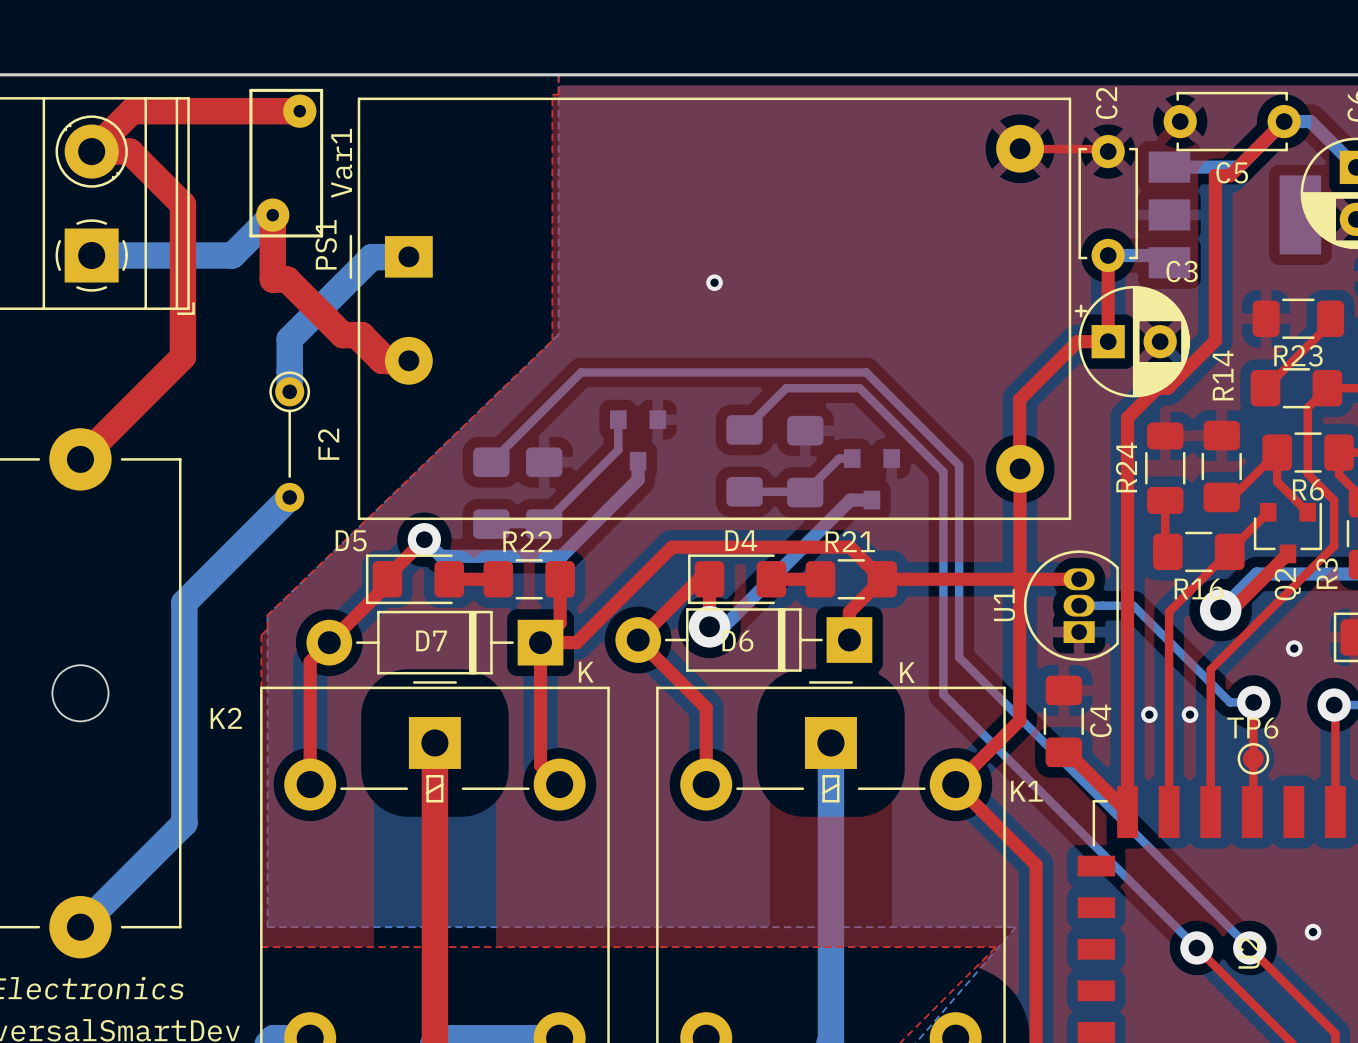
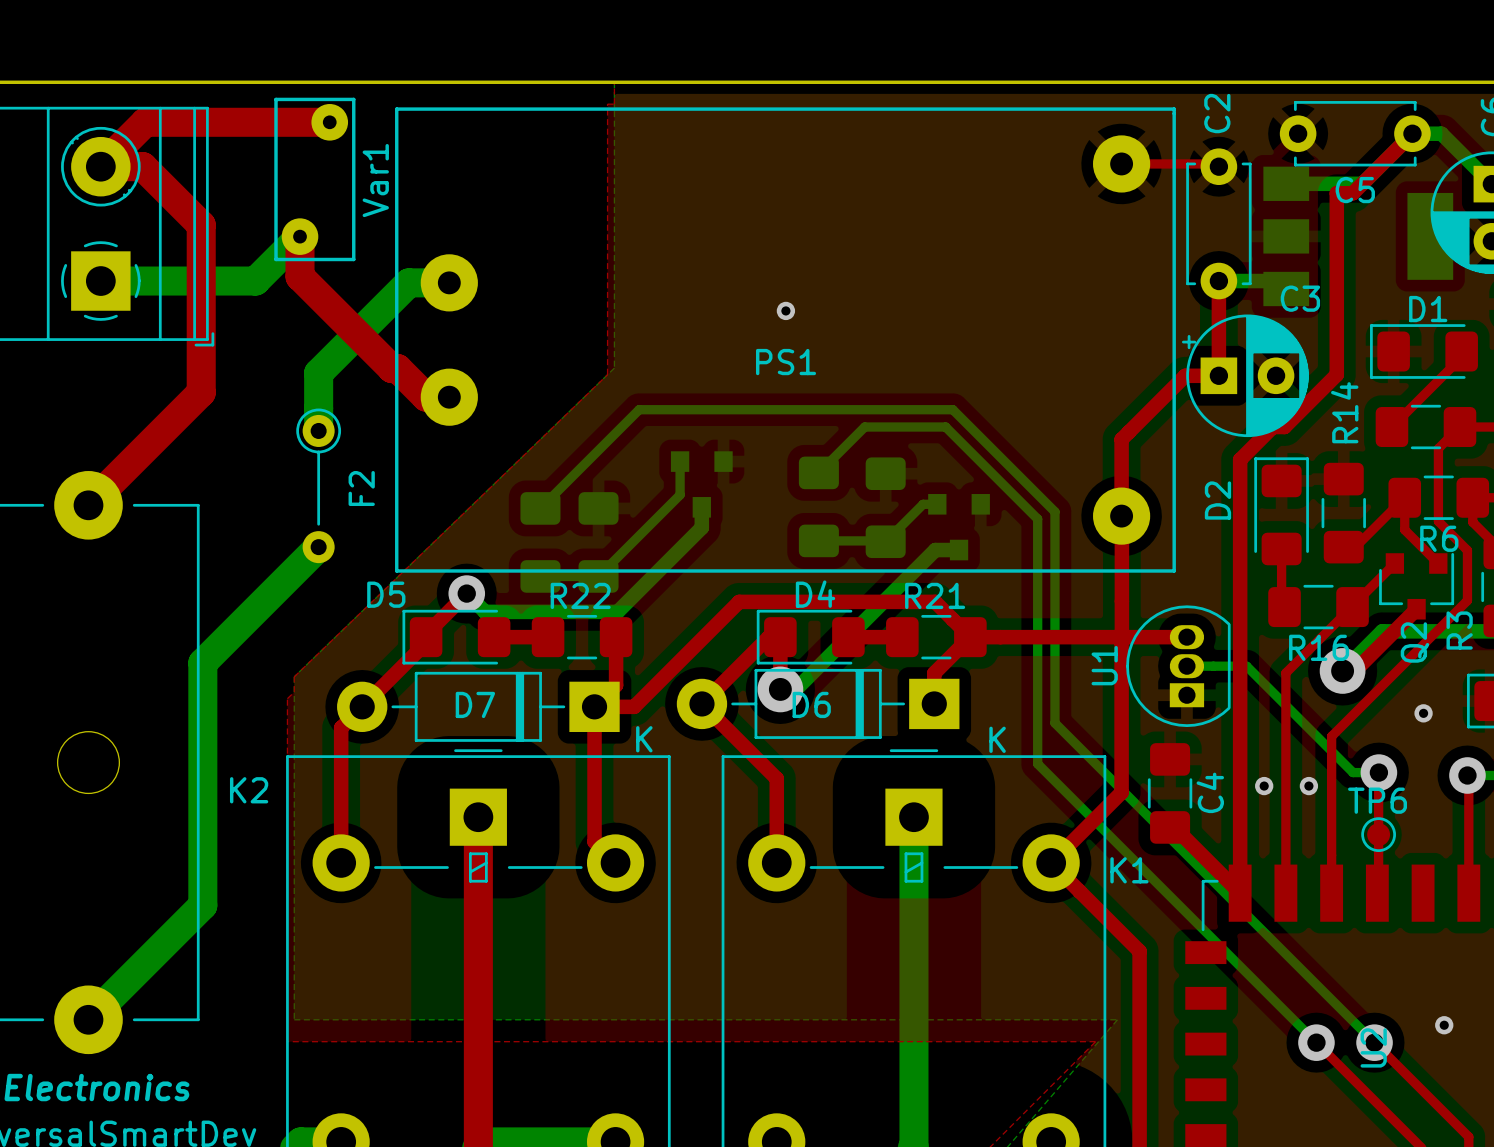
PS1 footprint: [349, 97, 1072, 521] -> [395, 107, 1176, 573]
PS1 name rotation: 0° (326, 244) -> 90° clockwise (786, 362)
PS1 name position: PS1 (326, 244) -> PS1 (786, 362)
top track: (272, 251) (272, 279) (287, 279) (342, 335) (356, 335) (382, 360) (408, 360) -> (300, 276) (391, 368)
R23: (1298, 318) -> none
D1: none -> (1423, 351)
D2: none -> (1281, 511)
R24: (1165, 468) -> none

